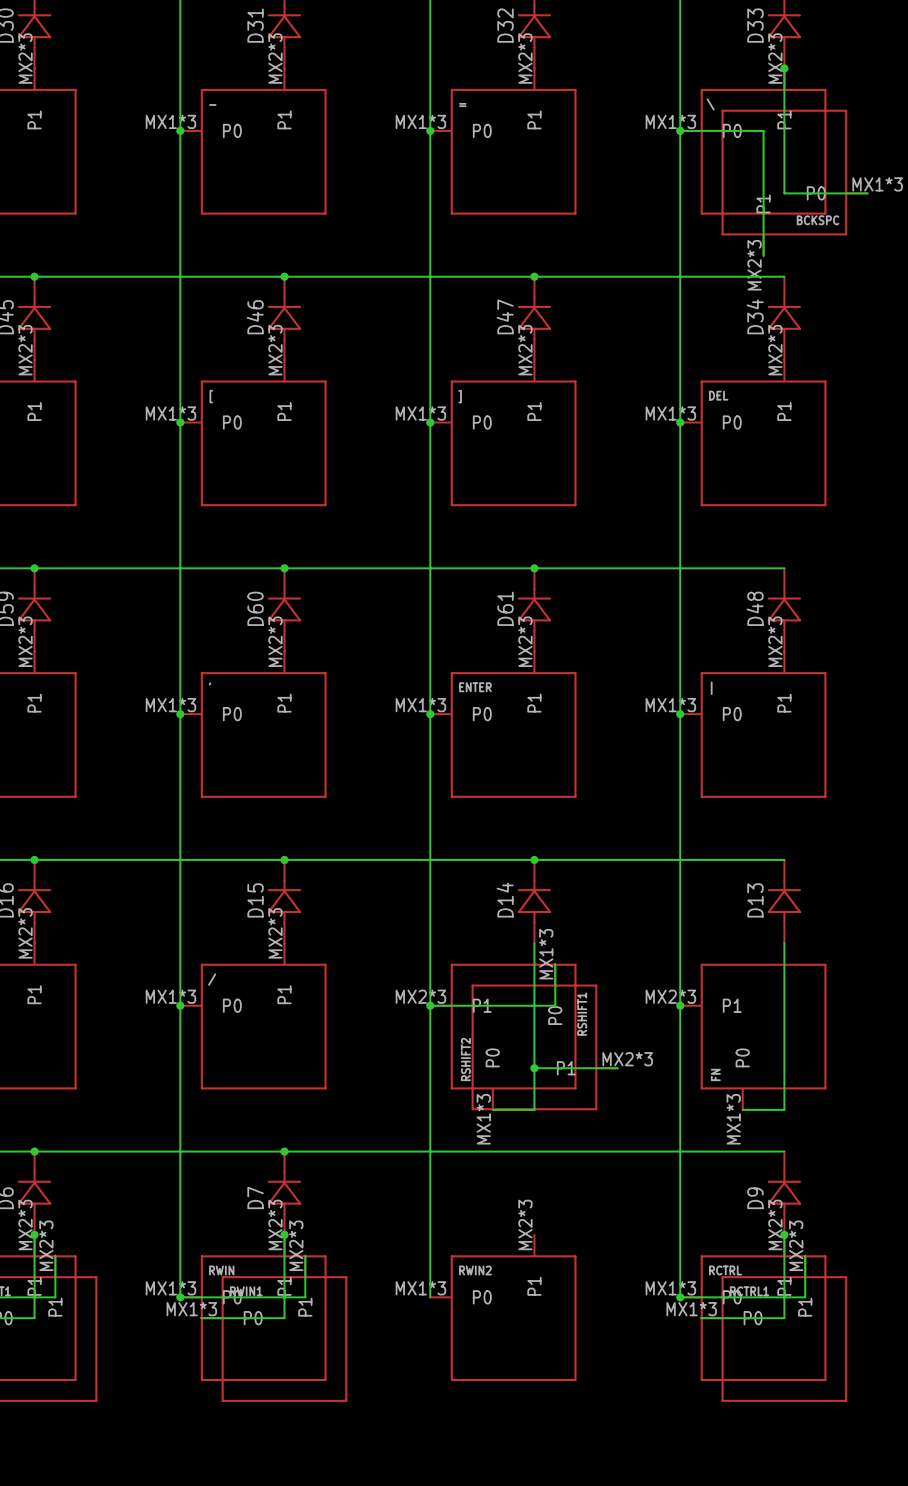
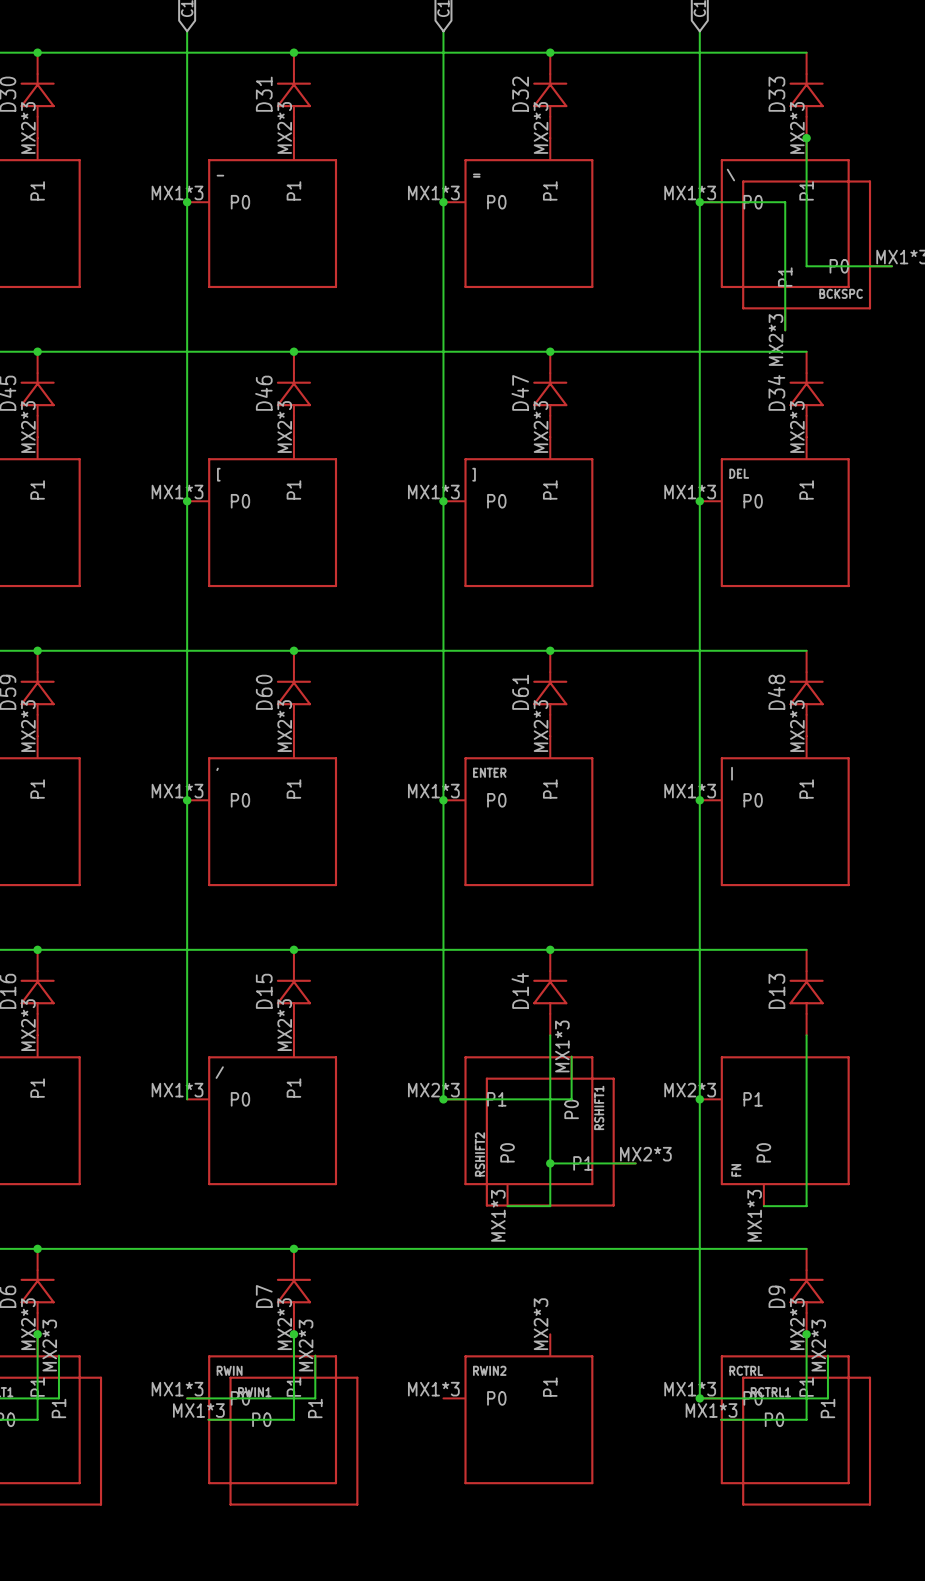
wire: (180, 1005) (180, 1297) -> none
junction: (180, 1005) -> none
wire: (430, 1005) (430, 1297) -> none
junction: (180, 1297) -> none

